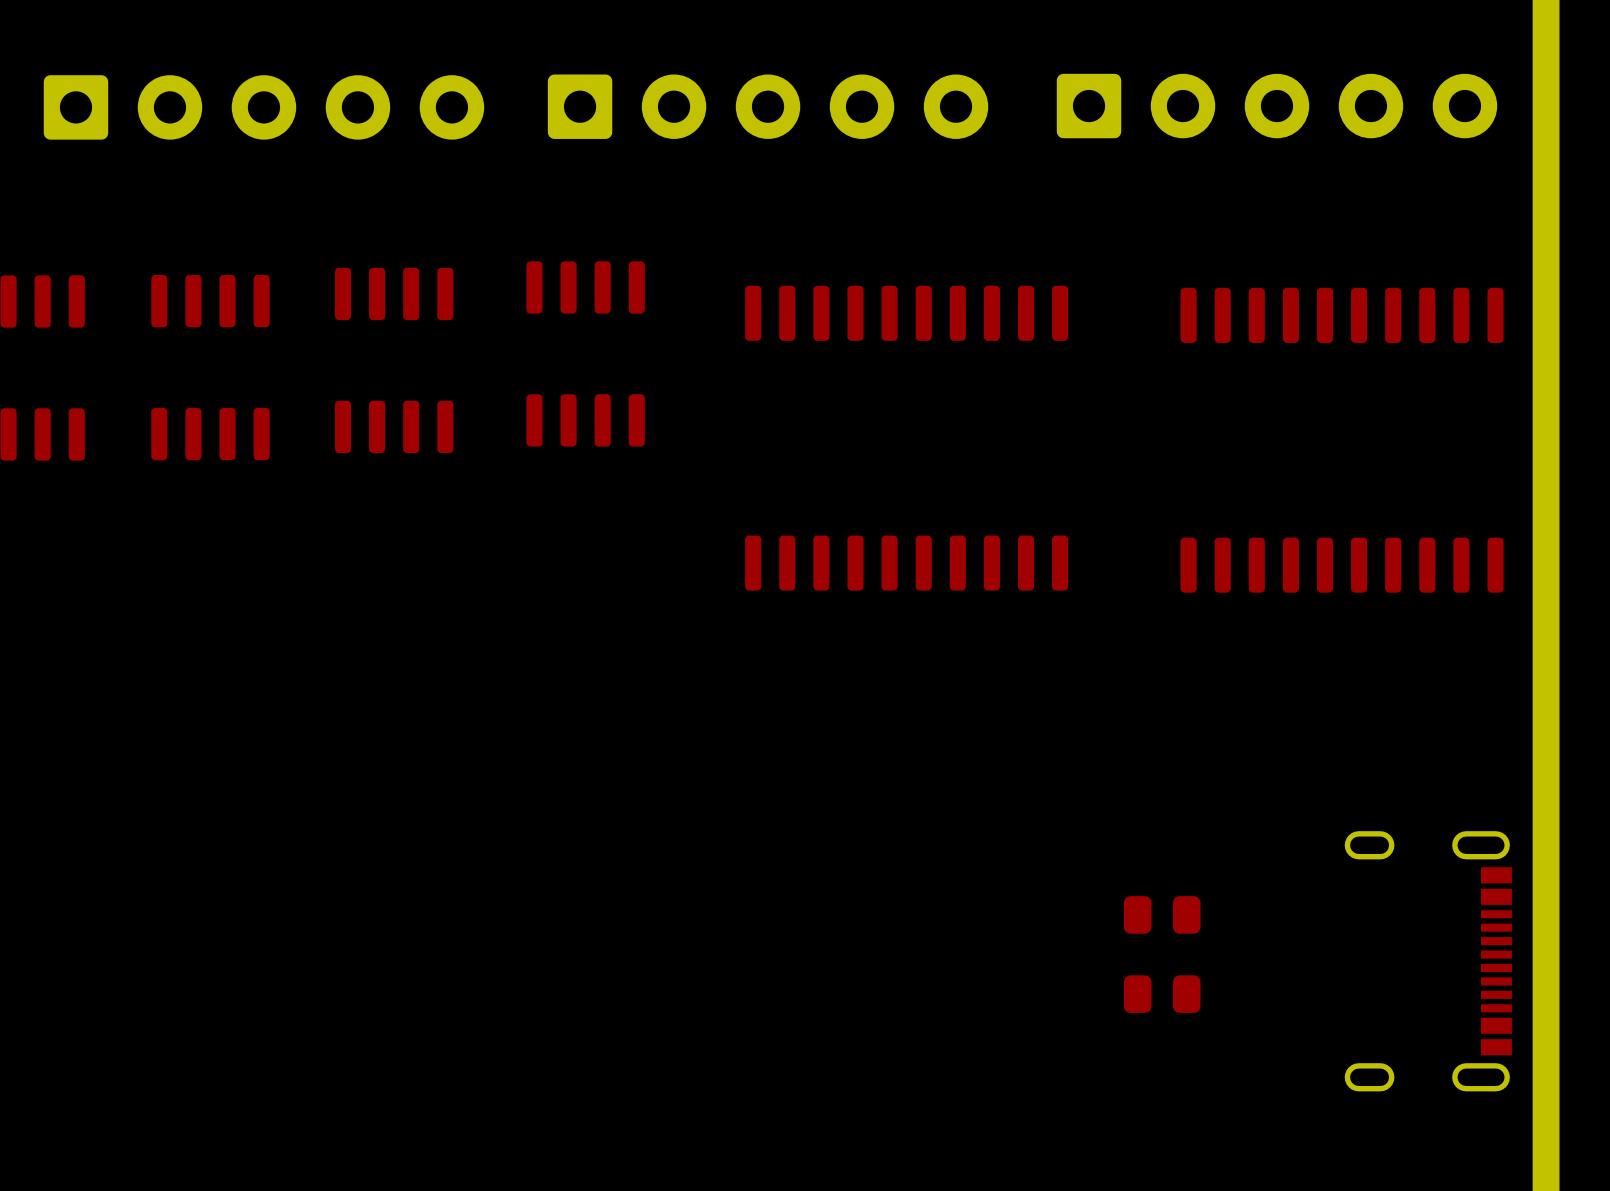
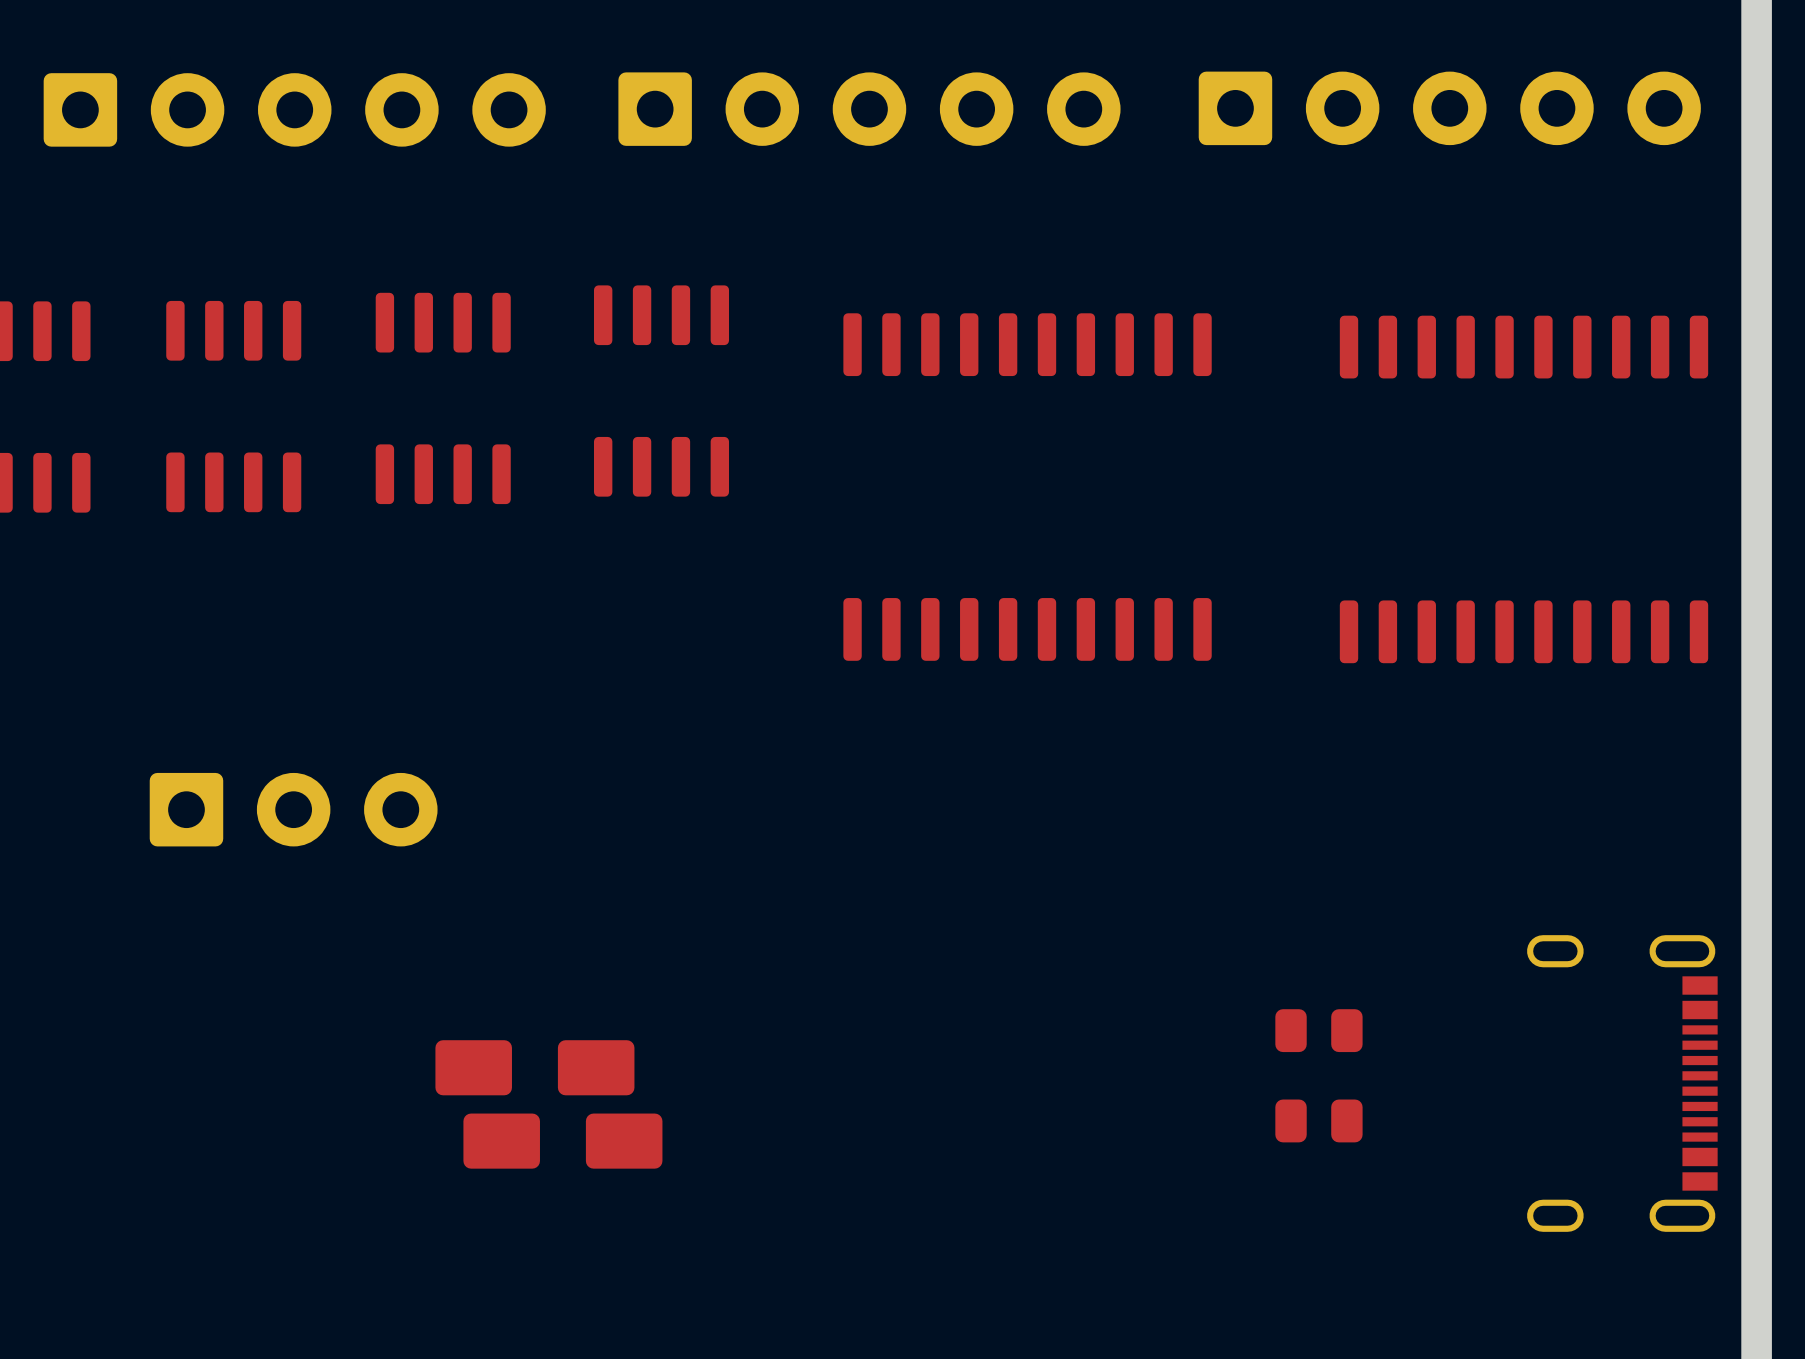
part: none -> (293, 809)
part: none -> (534, 1067)
part: none -> (562, 1141)

